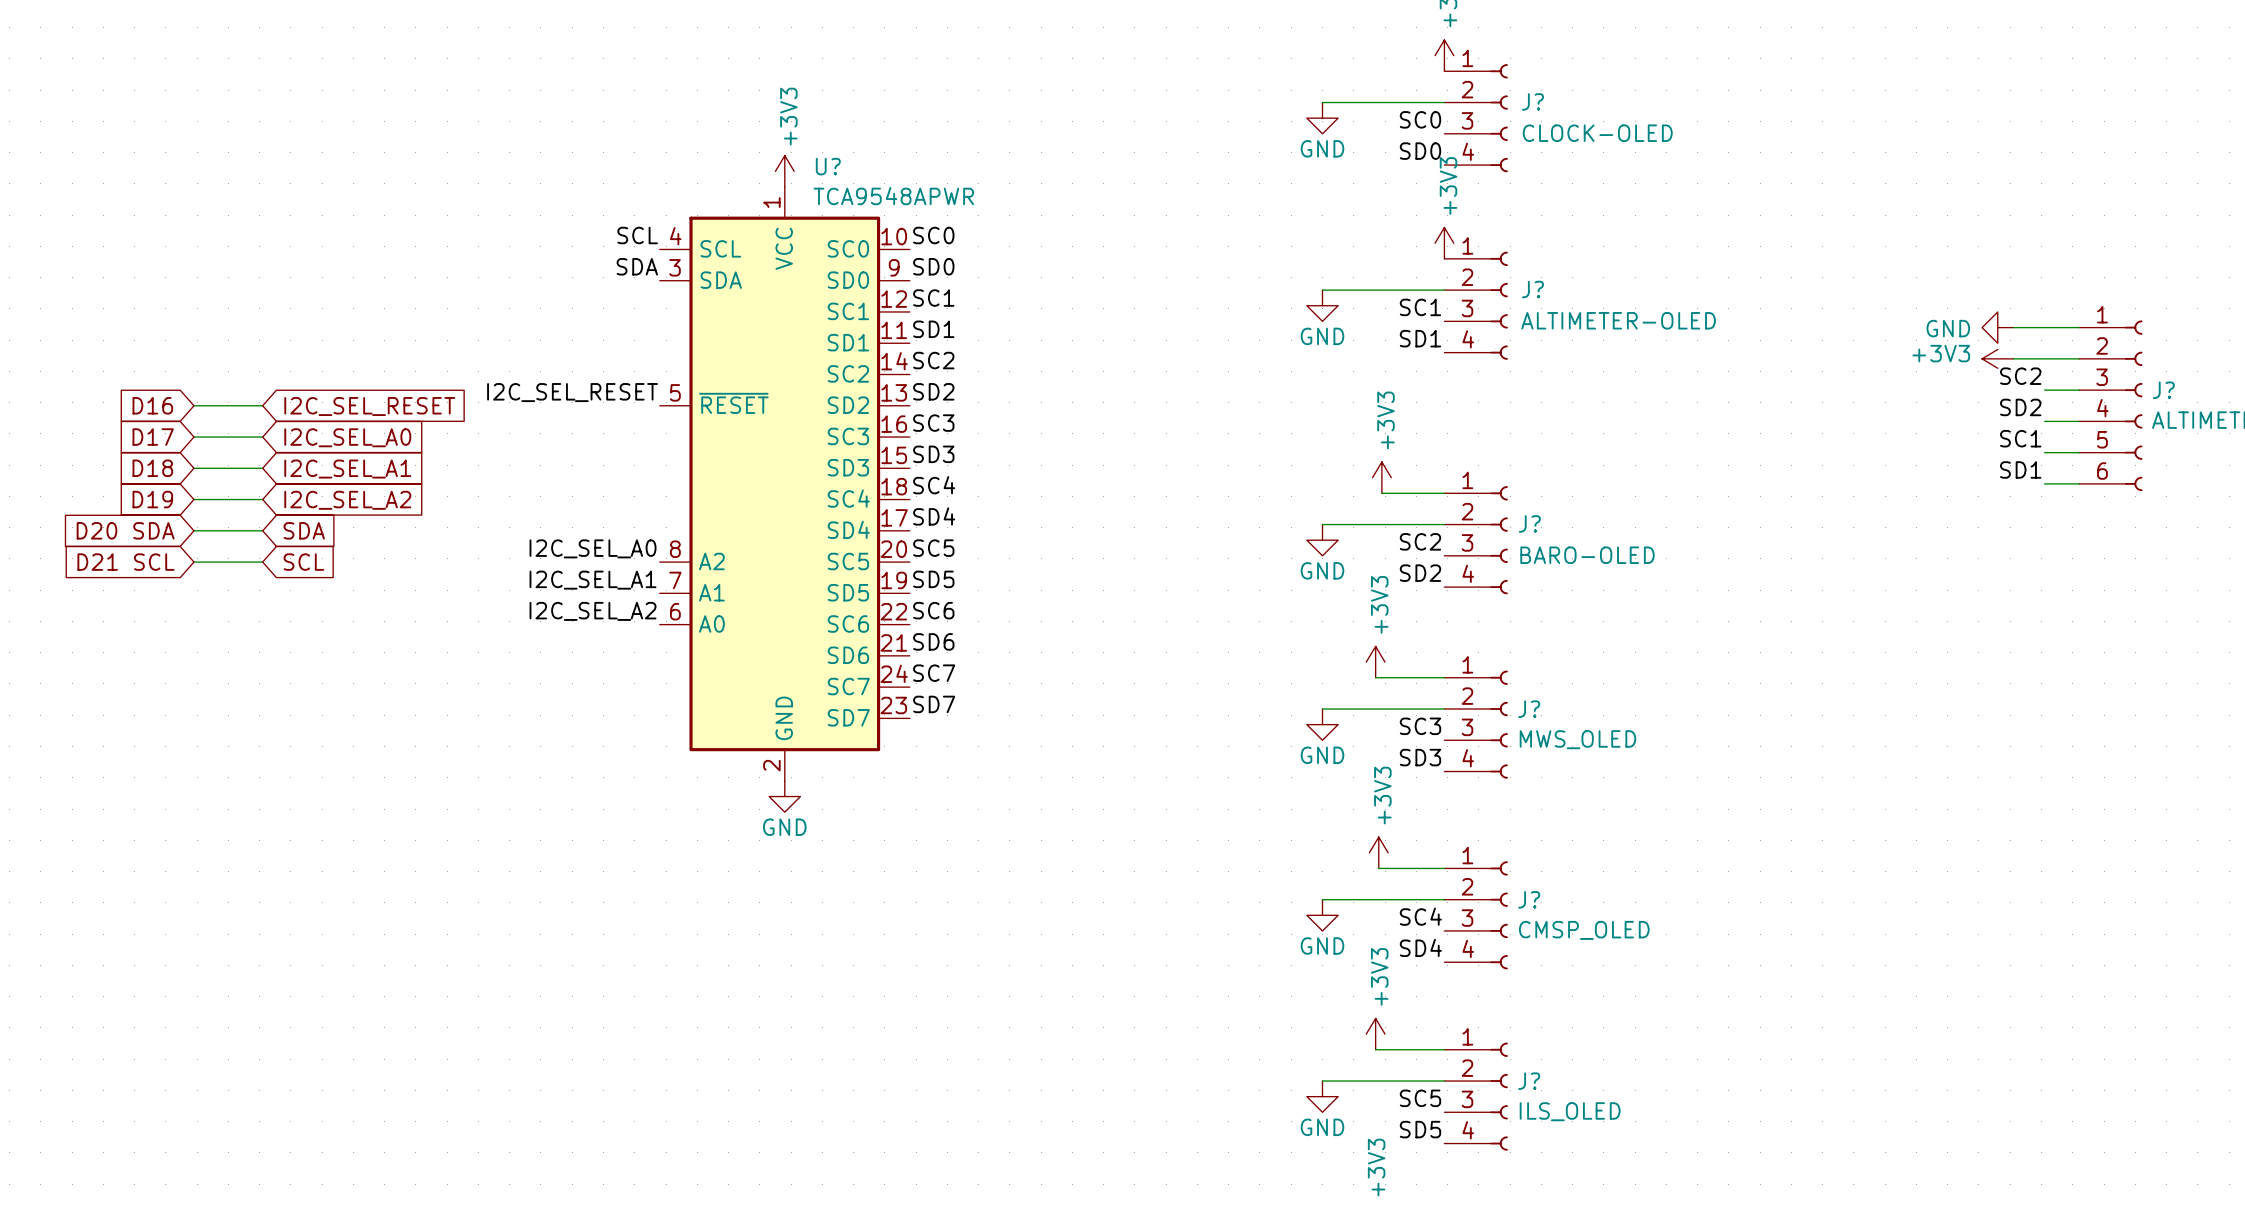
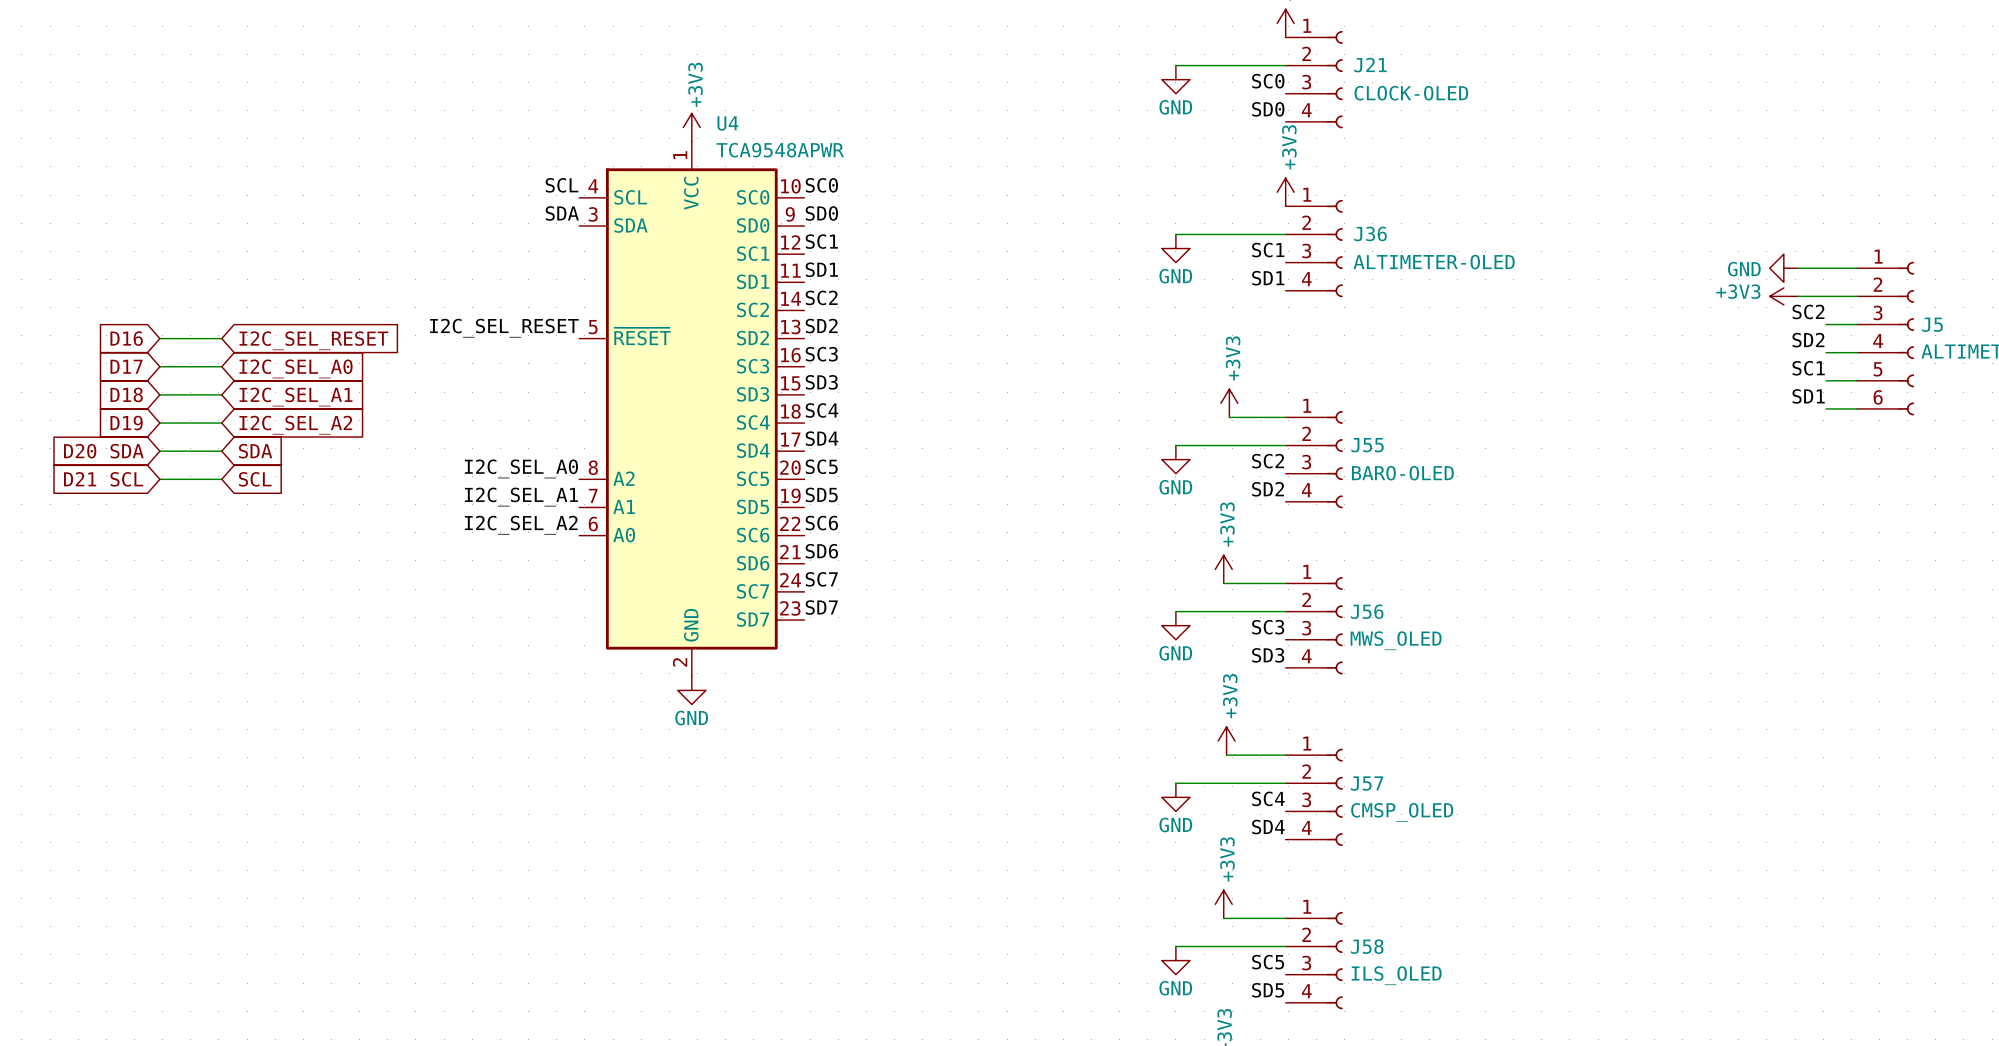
J? name: J? (1532, 101) -> J21 (1370, 65)
U? name: U? (828, 166) -> U4 (727, 123)
J? name: J? (1532, 289) -> J36 (1370, 233)
J? name: J? (2163, 390) -> J5 (1932, 324)
J? name: J? (1529, 523) -> J55 (1367, 445)
J? name: J? (1529, 709) -> J56 (1367, 611)
J? name: J? (1529, 899) -> J57 (1367, 783)
J? name: J? (1529, 1081) -> J58 (1367, 946)

